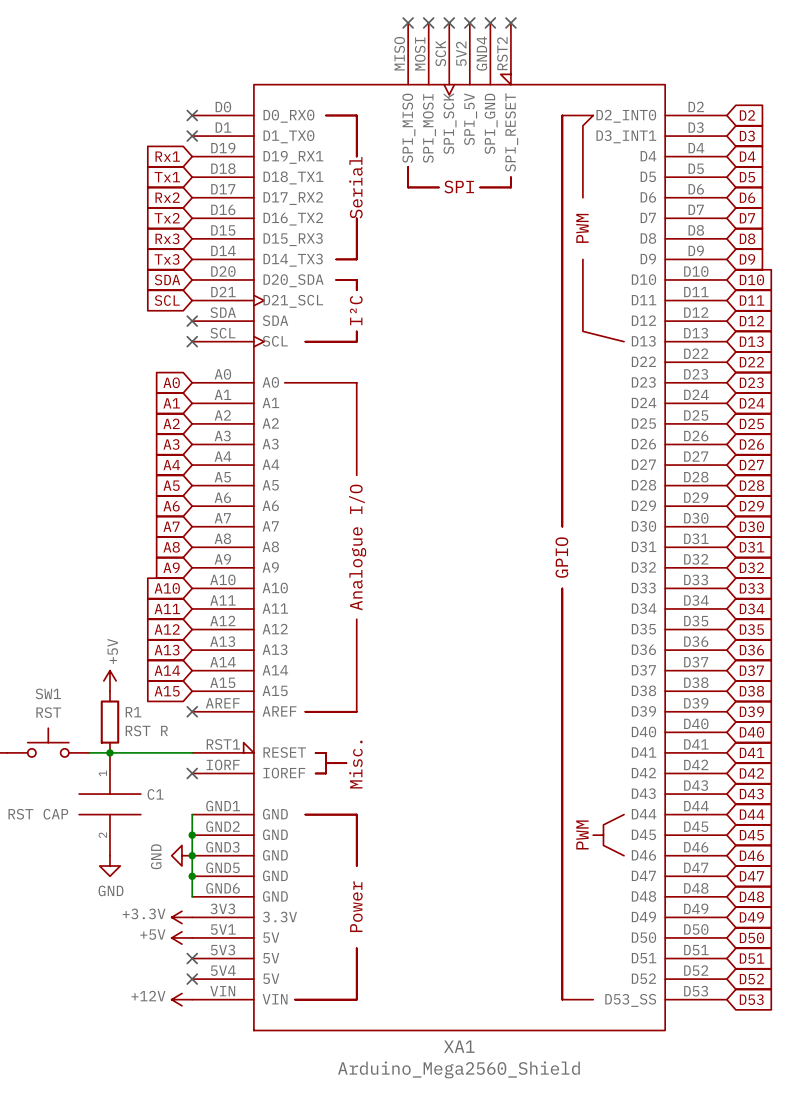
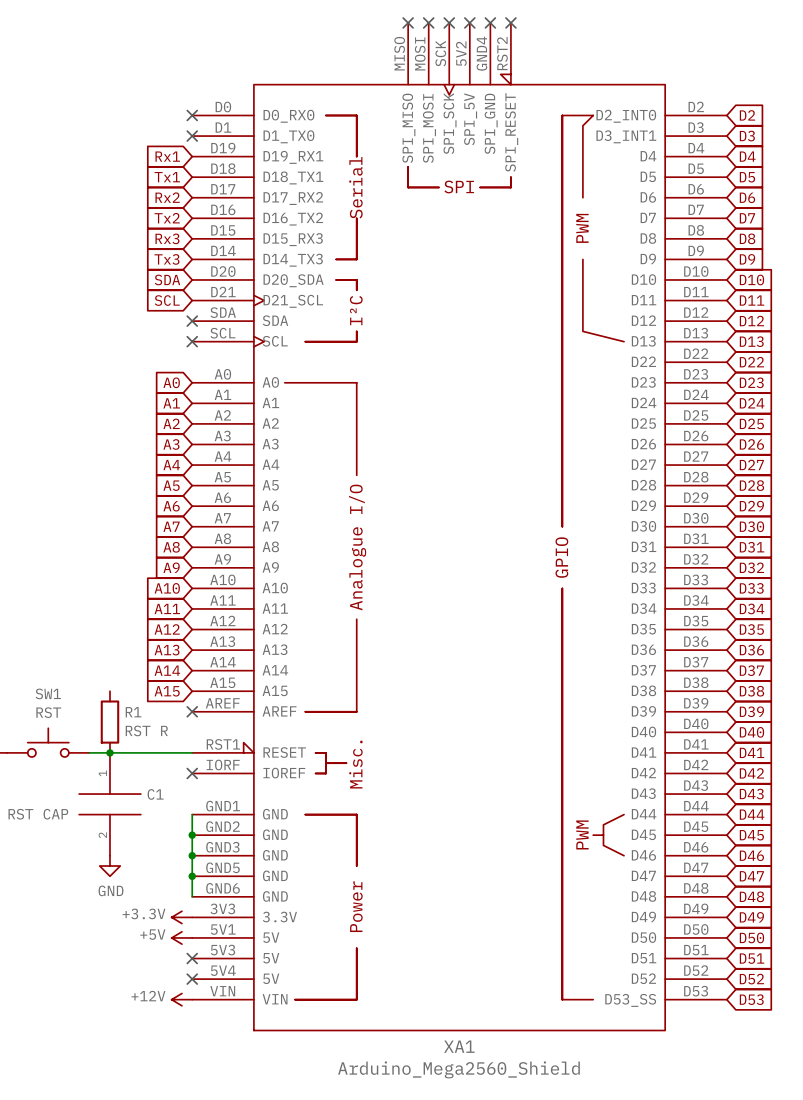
power symbol: +5V (109, 680) -> none
power symbol: GND (181, 855) -> none

